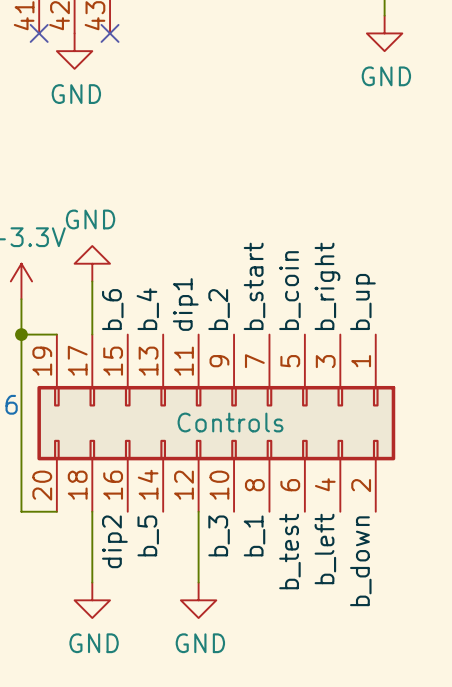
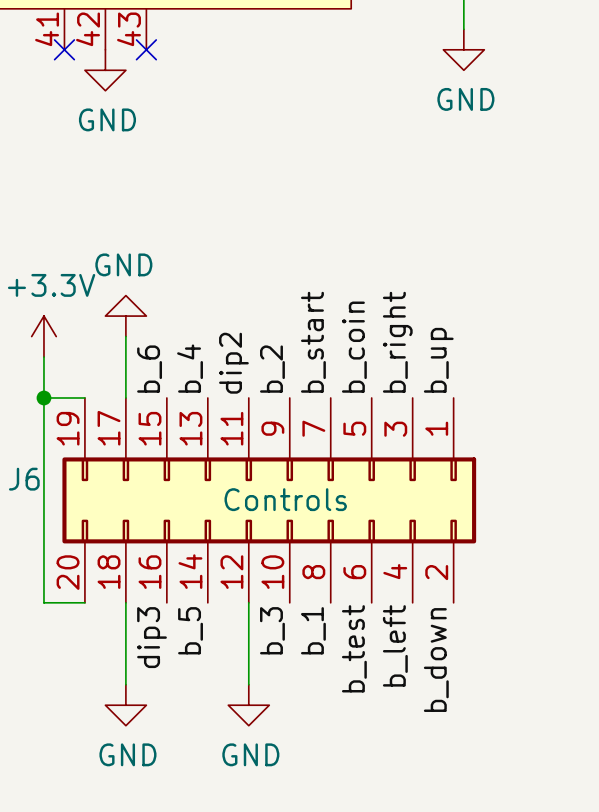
label: dip1 (185, 304) -> dip2 (233, 363)
label: dip2 (114, 541) -> dip3 (152, 637)

